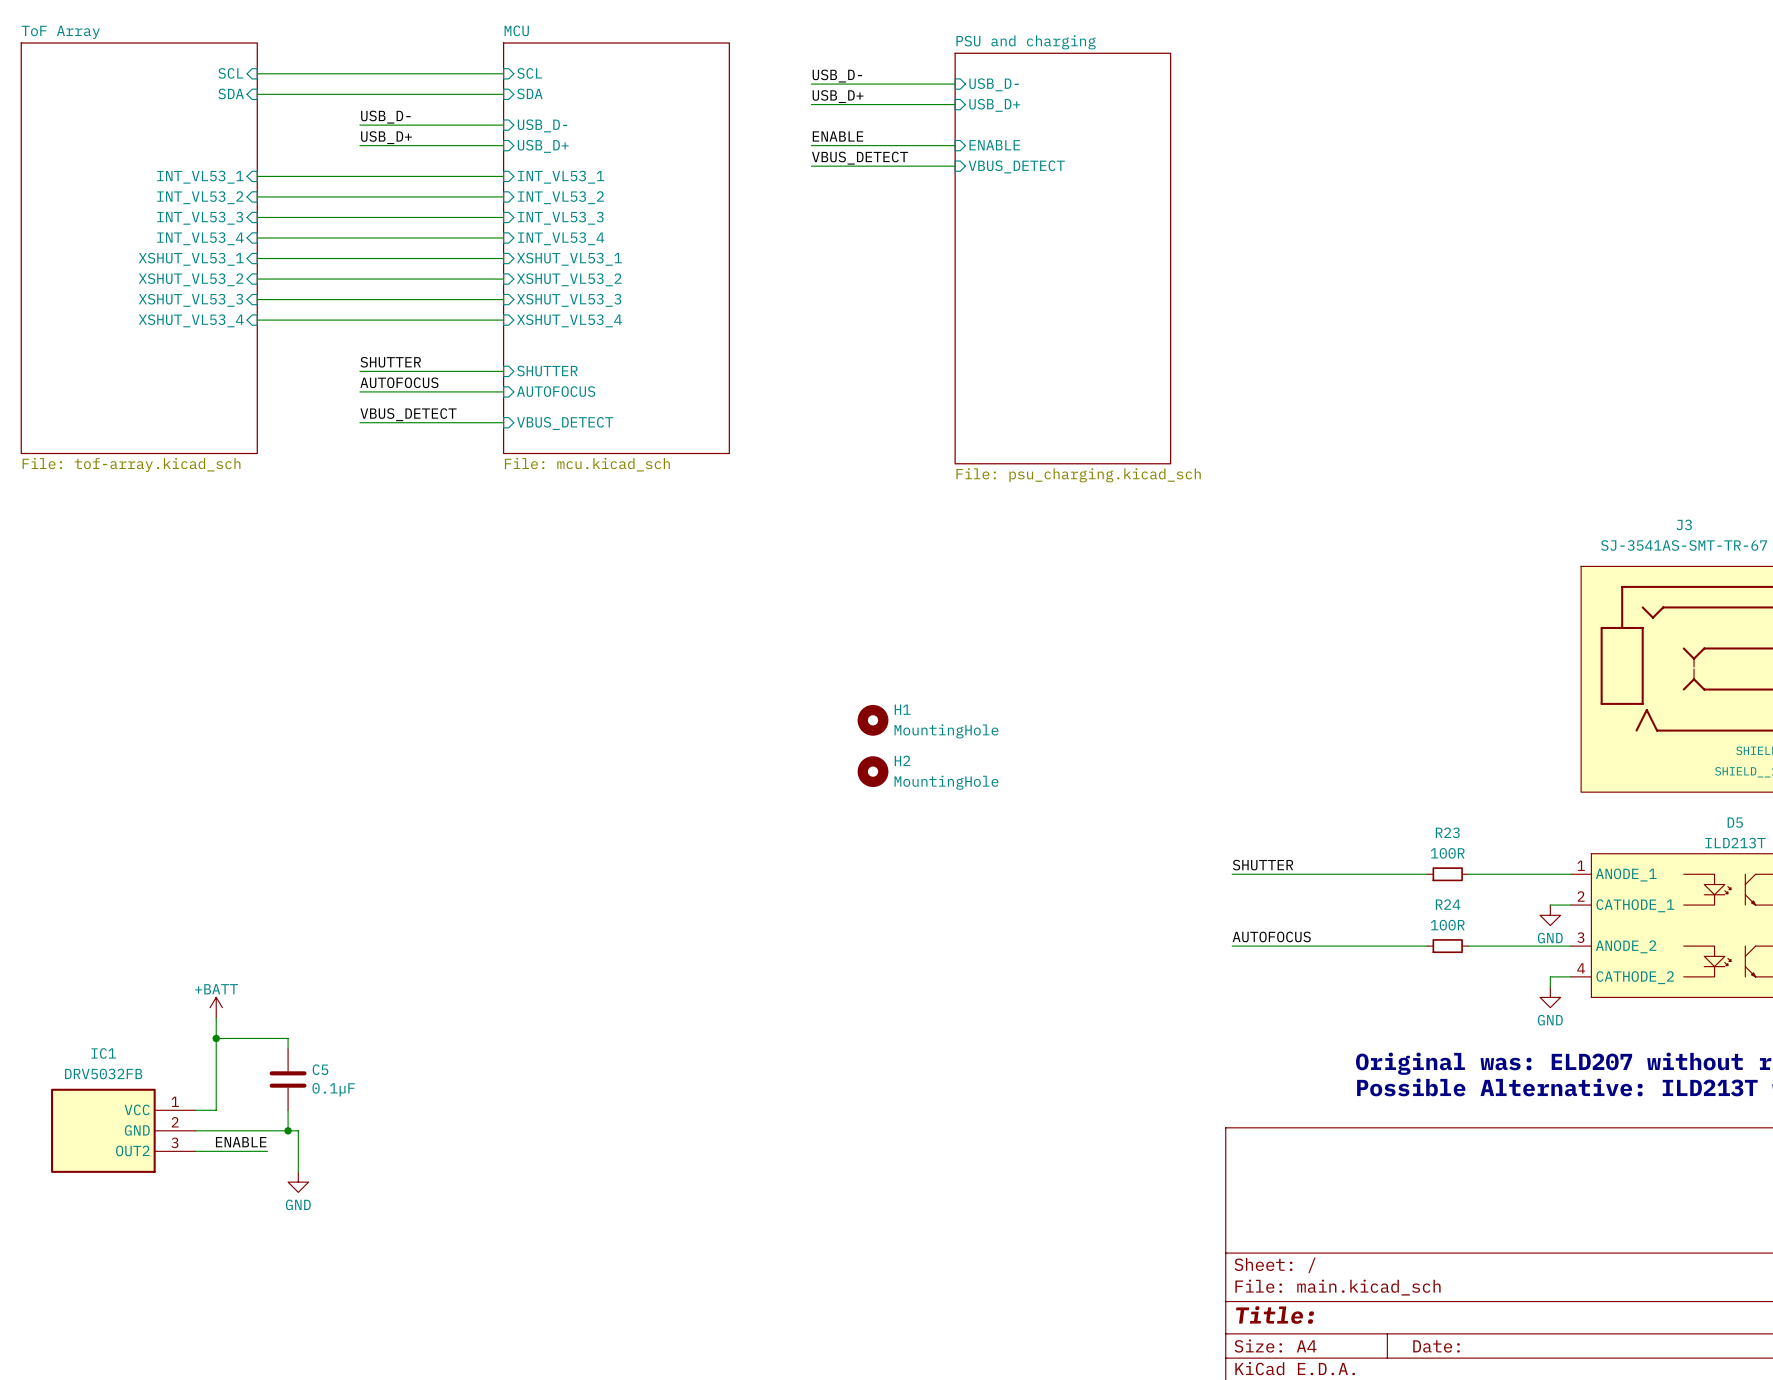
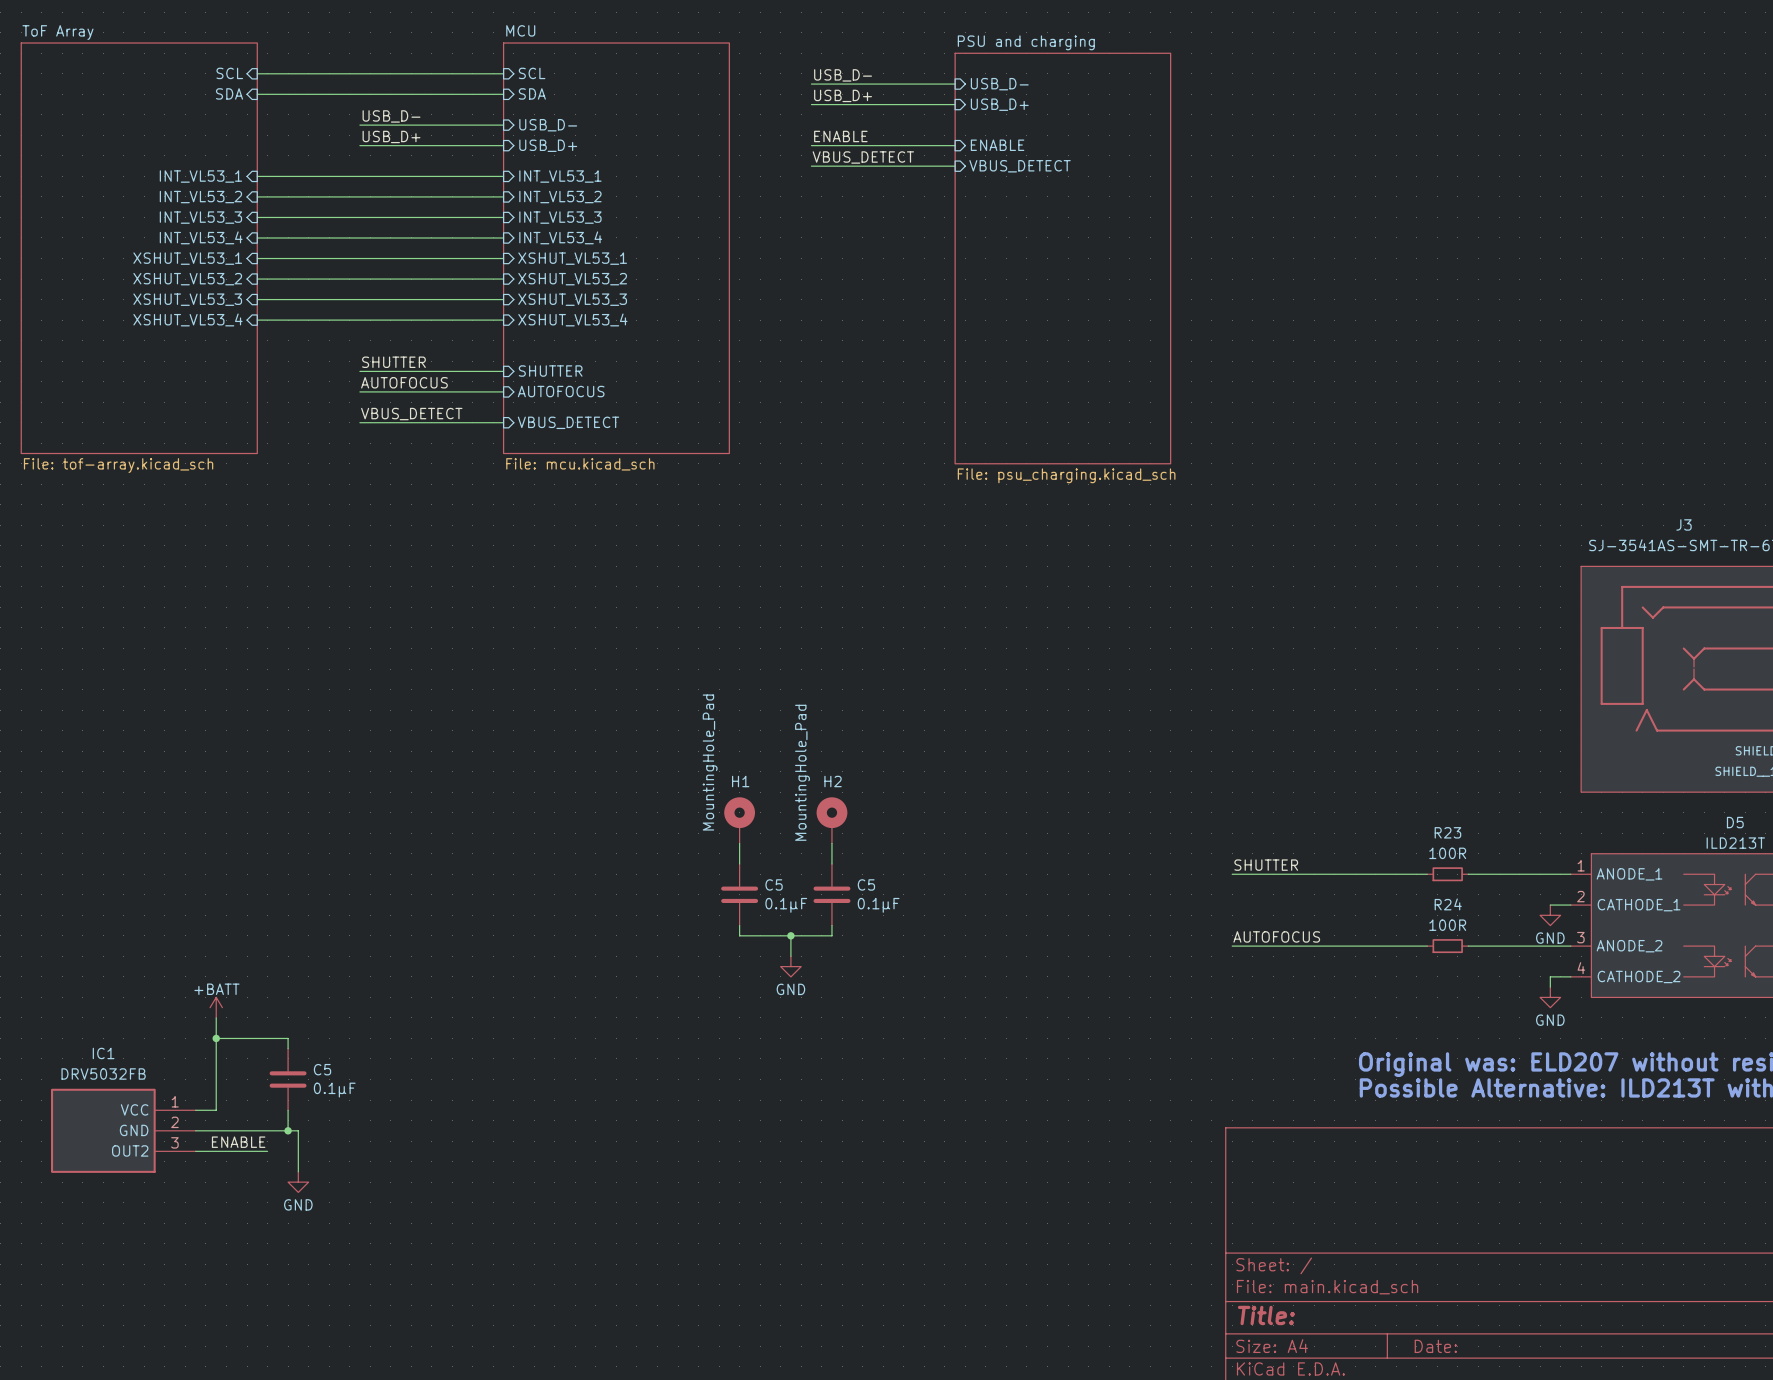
H1 symbol: [857, 704, 889, 736] -> [724, 797, 756, 844]
H1 name position: H1 (902, 709) -> H1 (740, 781)
H1 value: MountingHole (946, 731) -> MountingHole_Pad (710, 762)
H2 symbol: [857, 756, 889, 788] -> [816, 797, 848, 844]
H2 name position: H2 (902, 760) -> H2 (833, 781)
H2 value: MountingHole (946, 782) -> MountingHole_Pad (802, 772)
wire: none -> (739, 843) (739, 863)
wire: none -> (831, 843) (831, 863)
C5: none -> 0.1µF (739, 894)
C5: none -> 0.1µF (831, 894)
wire: none -> (739, 925) (739, 935) (831, 935) (831, 925)
wire: none -> (790, 935) (790, 956)
junction: none -> (790, 935)
power symbol: none -> GND (790, 966)

